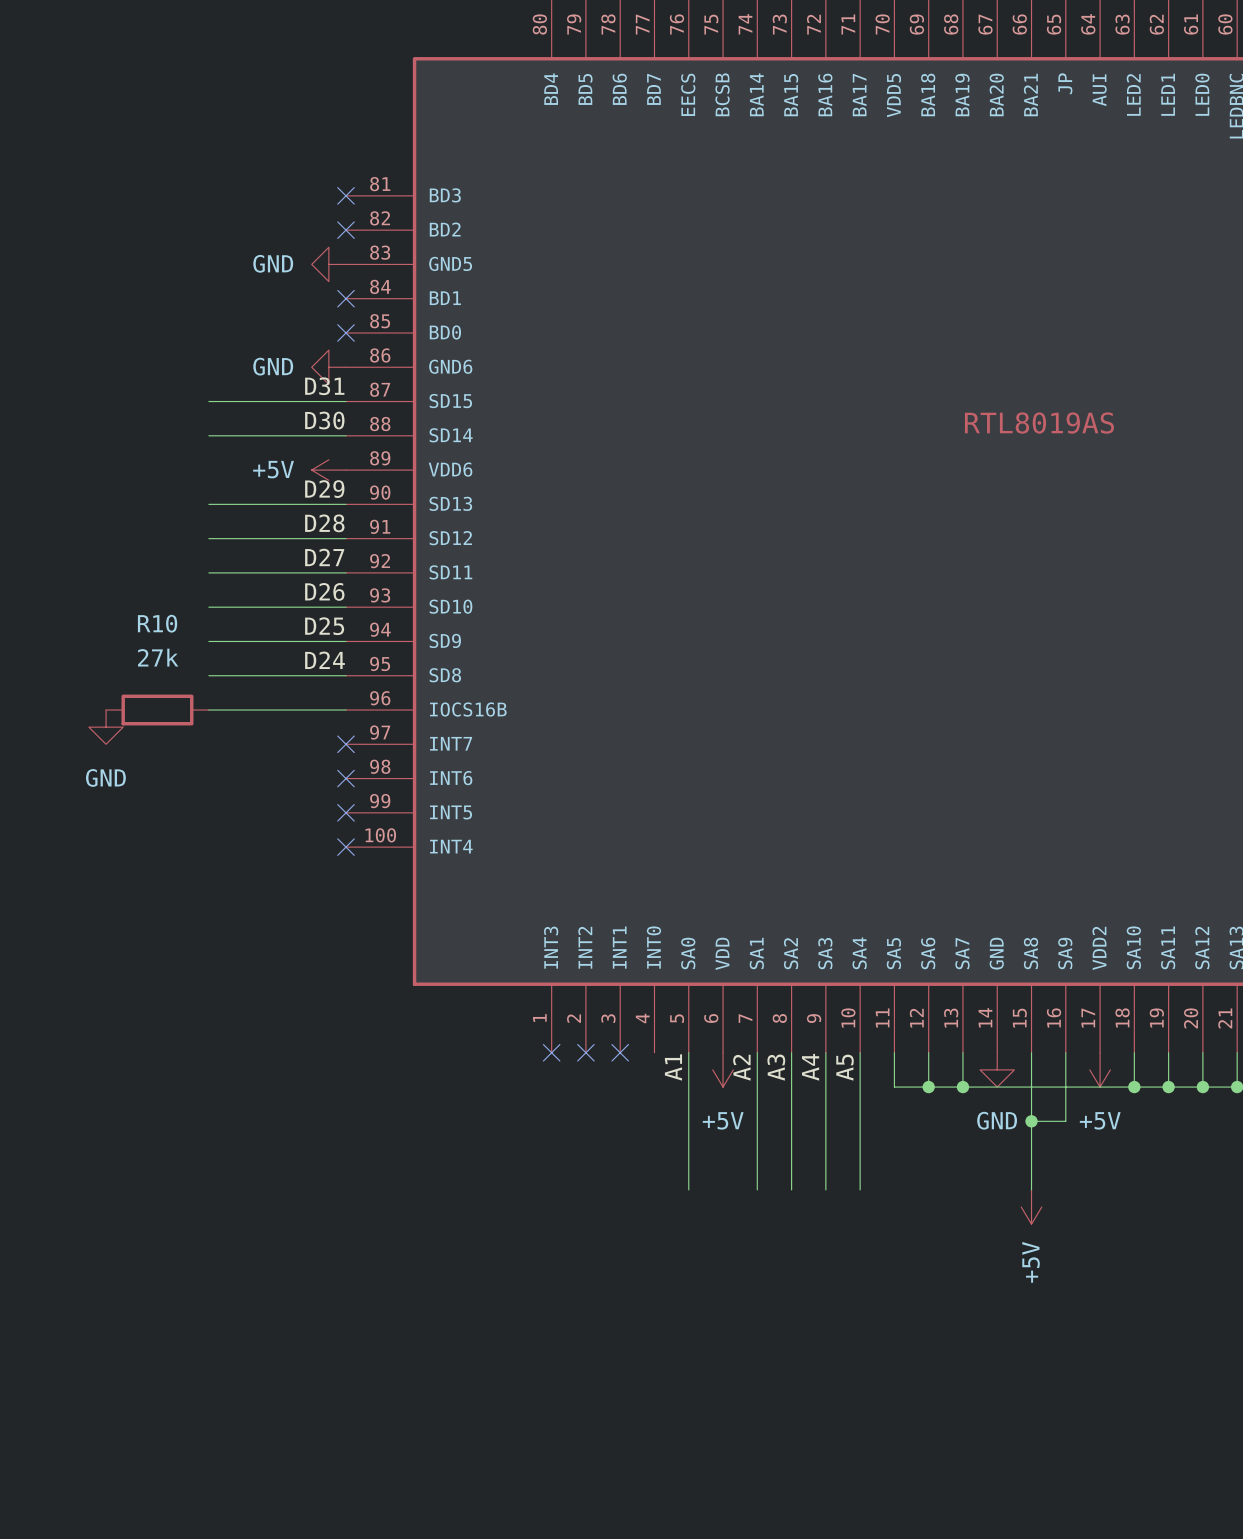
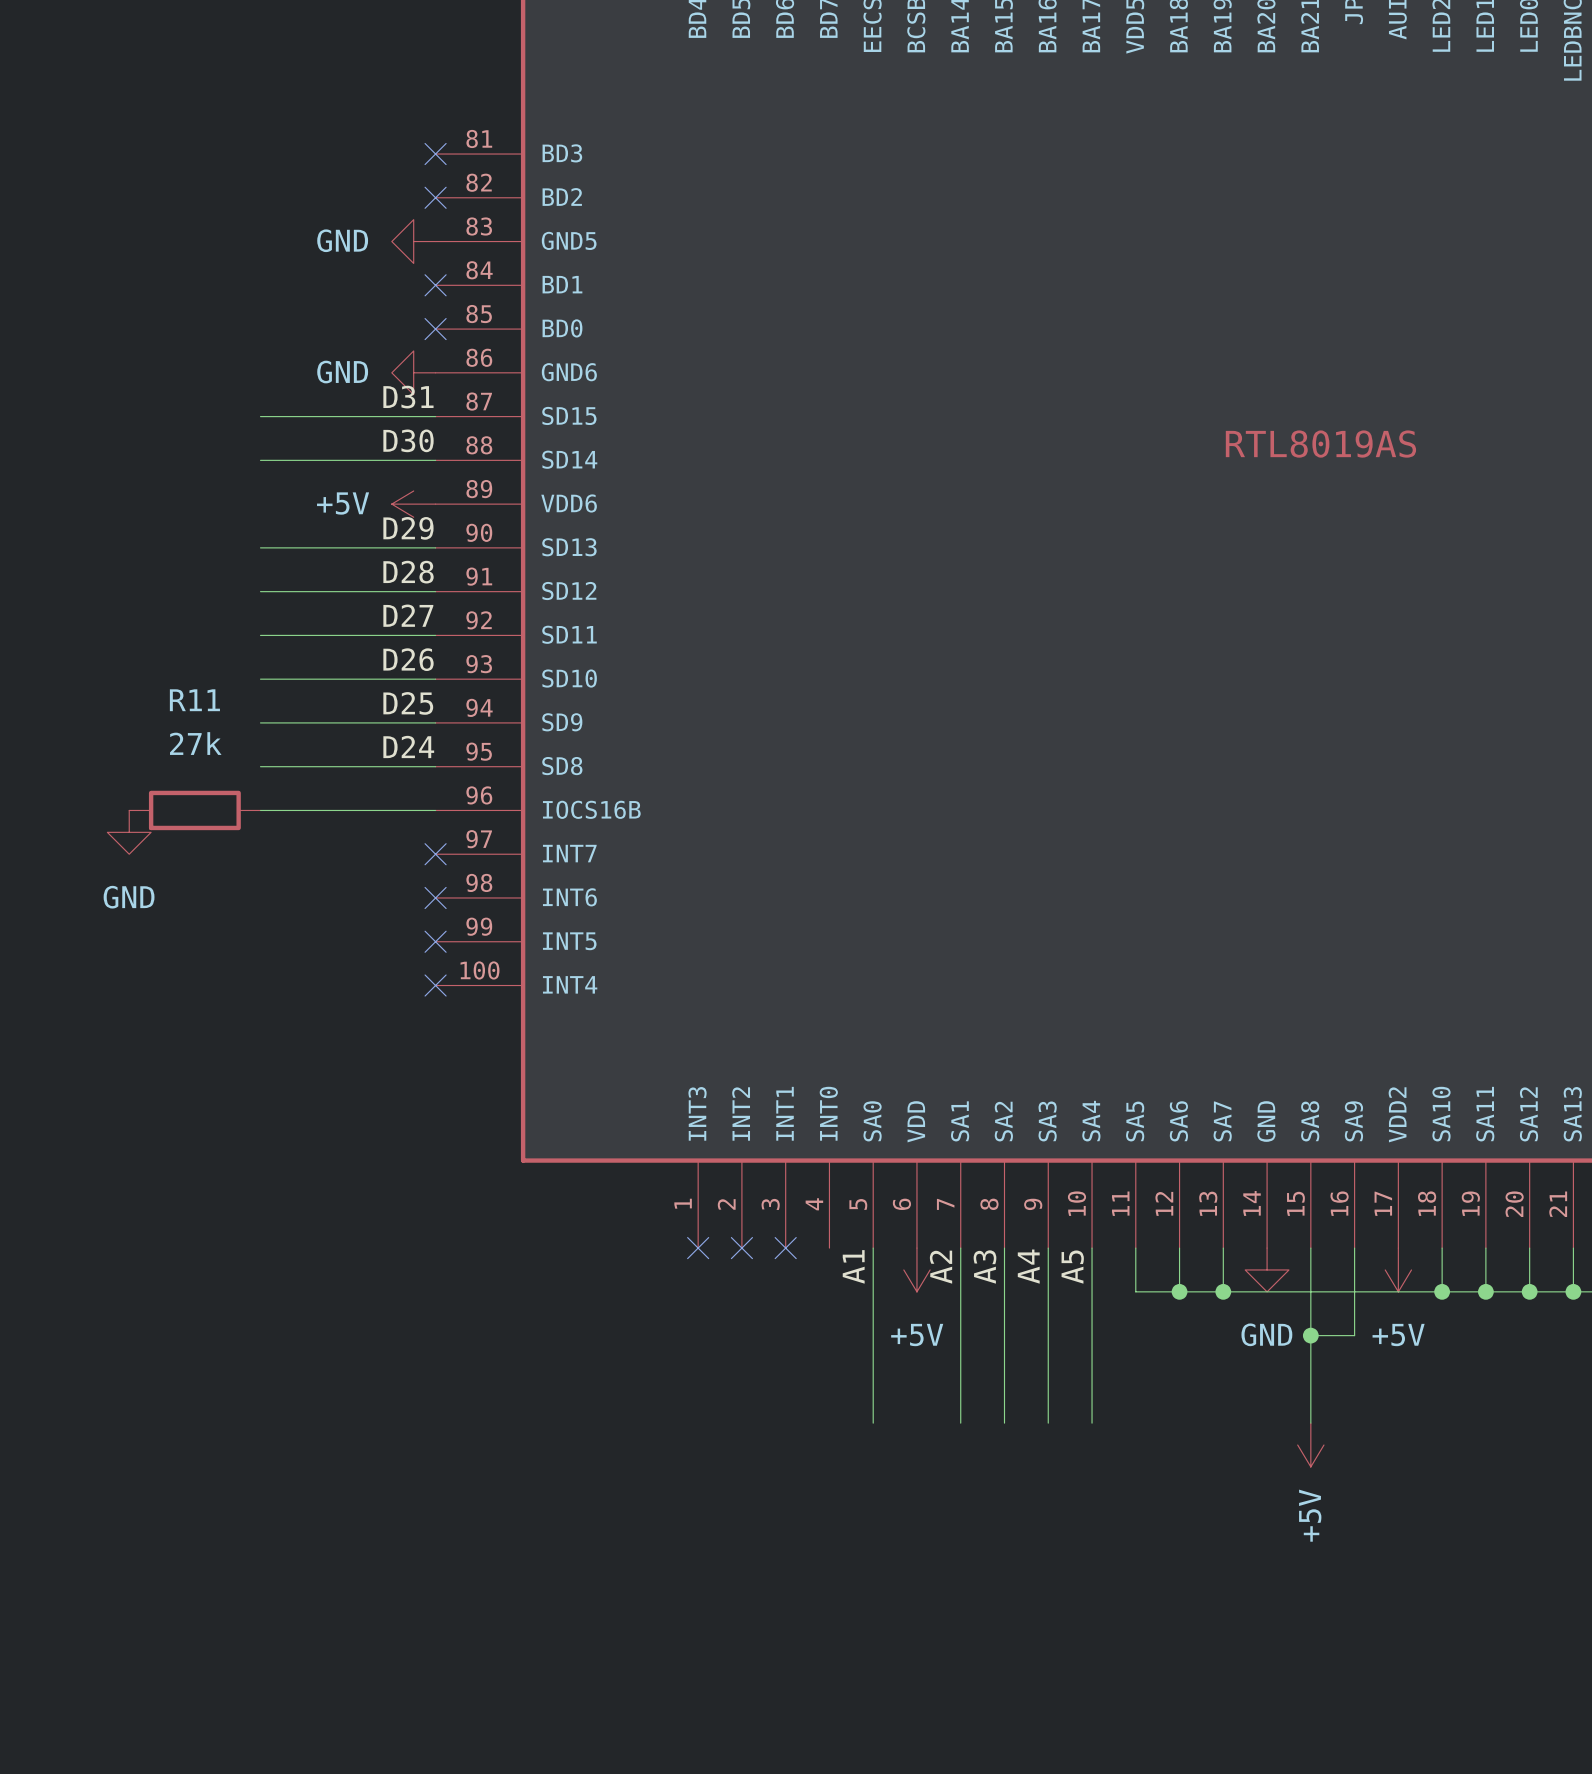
R10 name: R10 (157, 623) -> R11 (194, 700)

